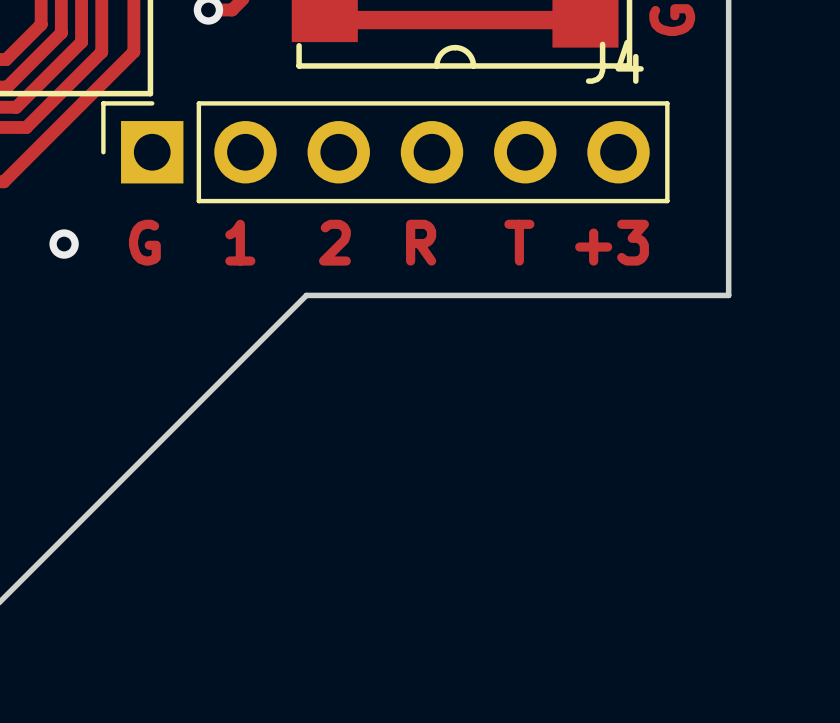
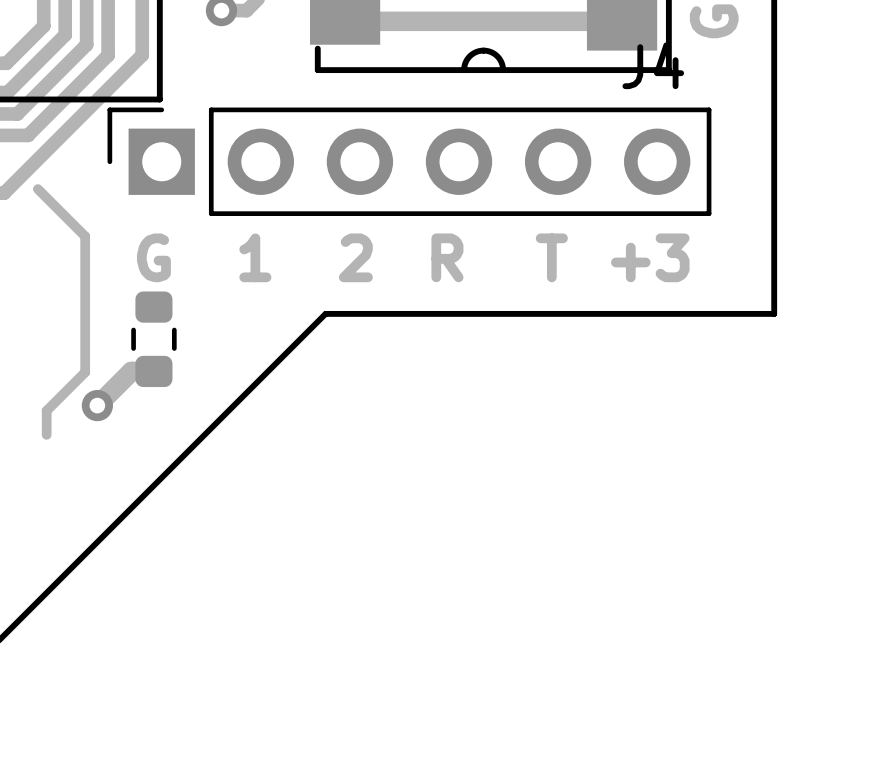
track: none -> (37, 189) (85, 236) (85, 372) (46, 410) (46, 434)
via: (64, 244) -> none
part: none -> (153, 339)
track: none -> (153, 371) (131, 371) (97, 405)
via: none -> (97, 405)

